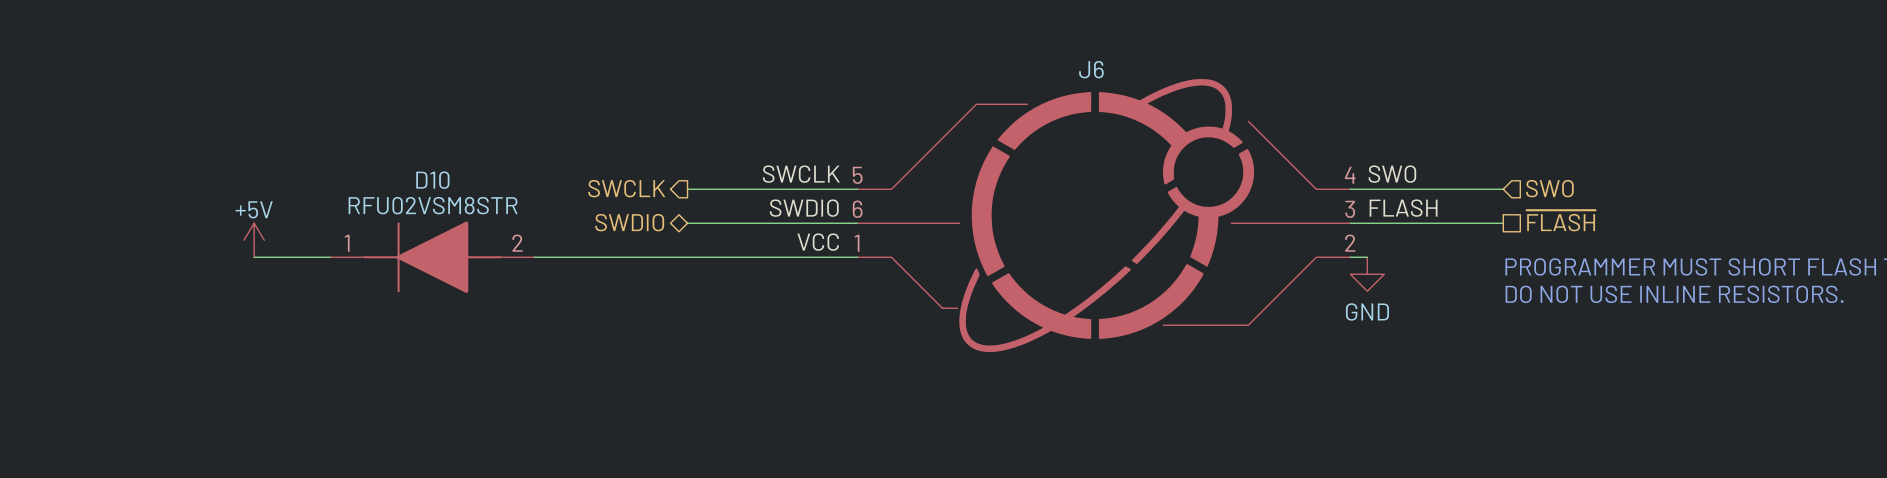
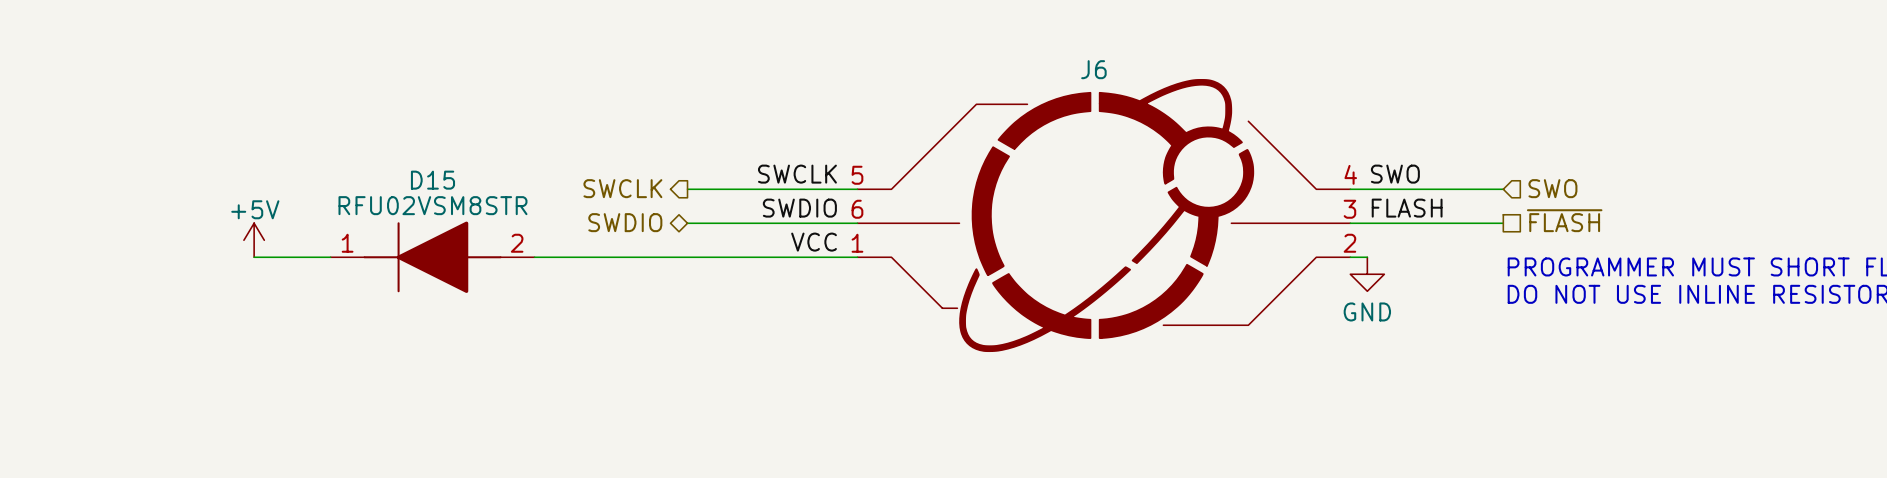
D10 name: D10 (432, 180) -> D15 (432, 180)

